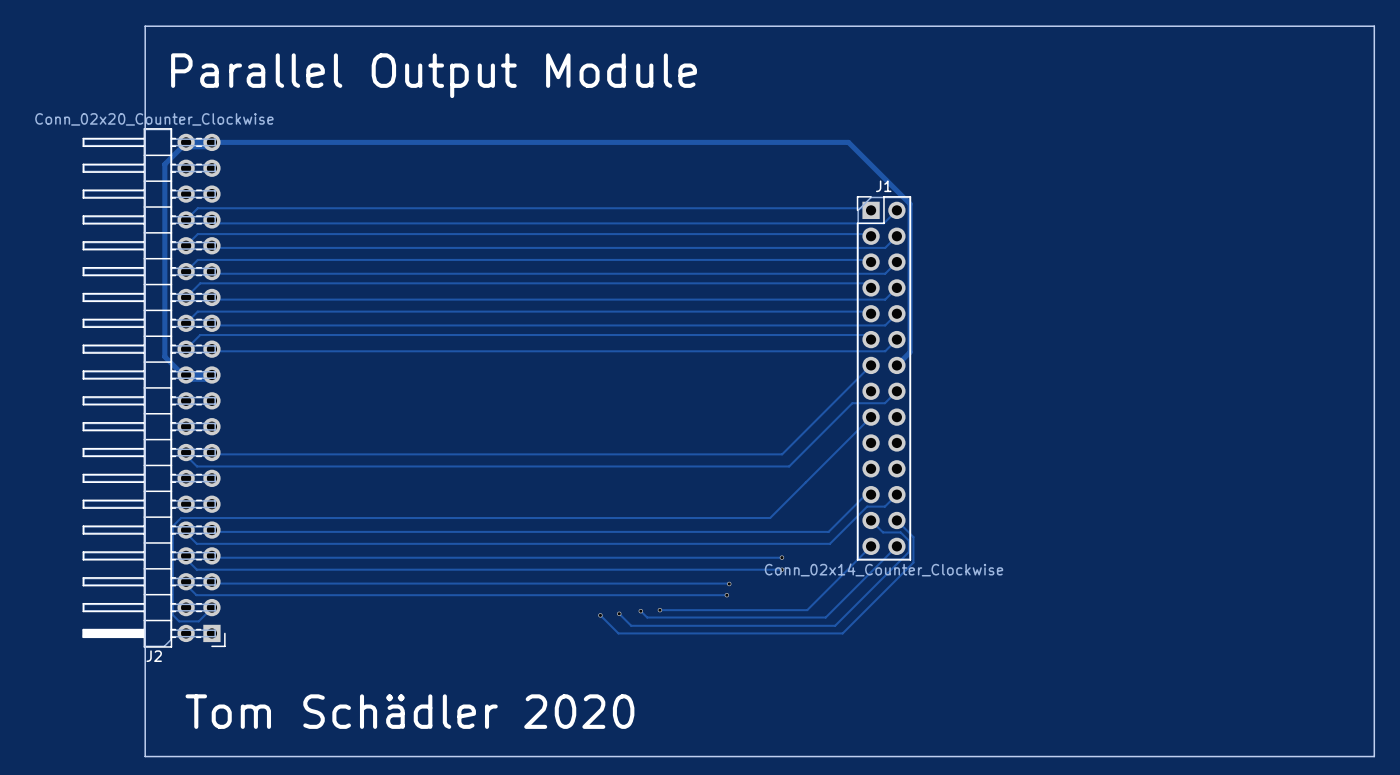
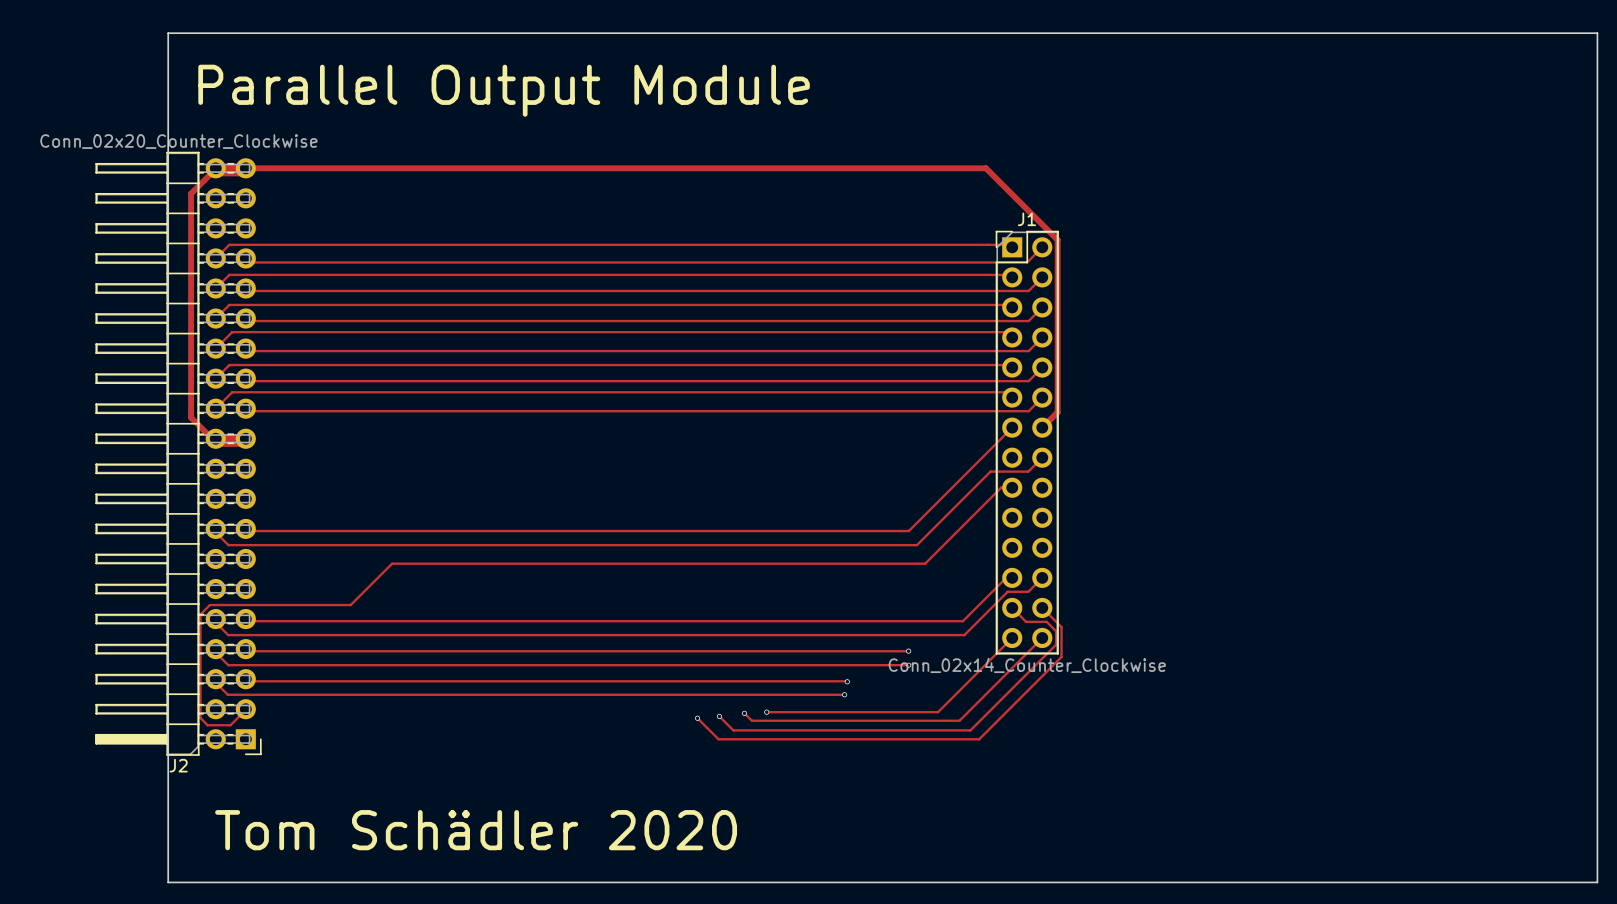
track: (871, 417) (770, 518) (302, 518) -> (1012, 487) (1001, 487) (925, 563) (392, 563) (350, 605)

